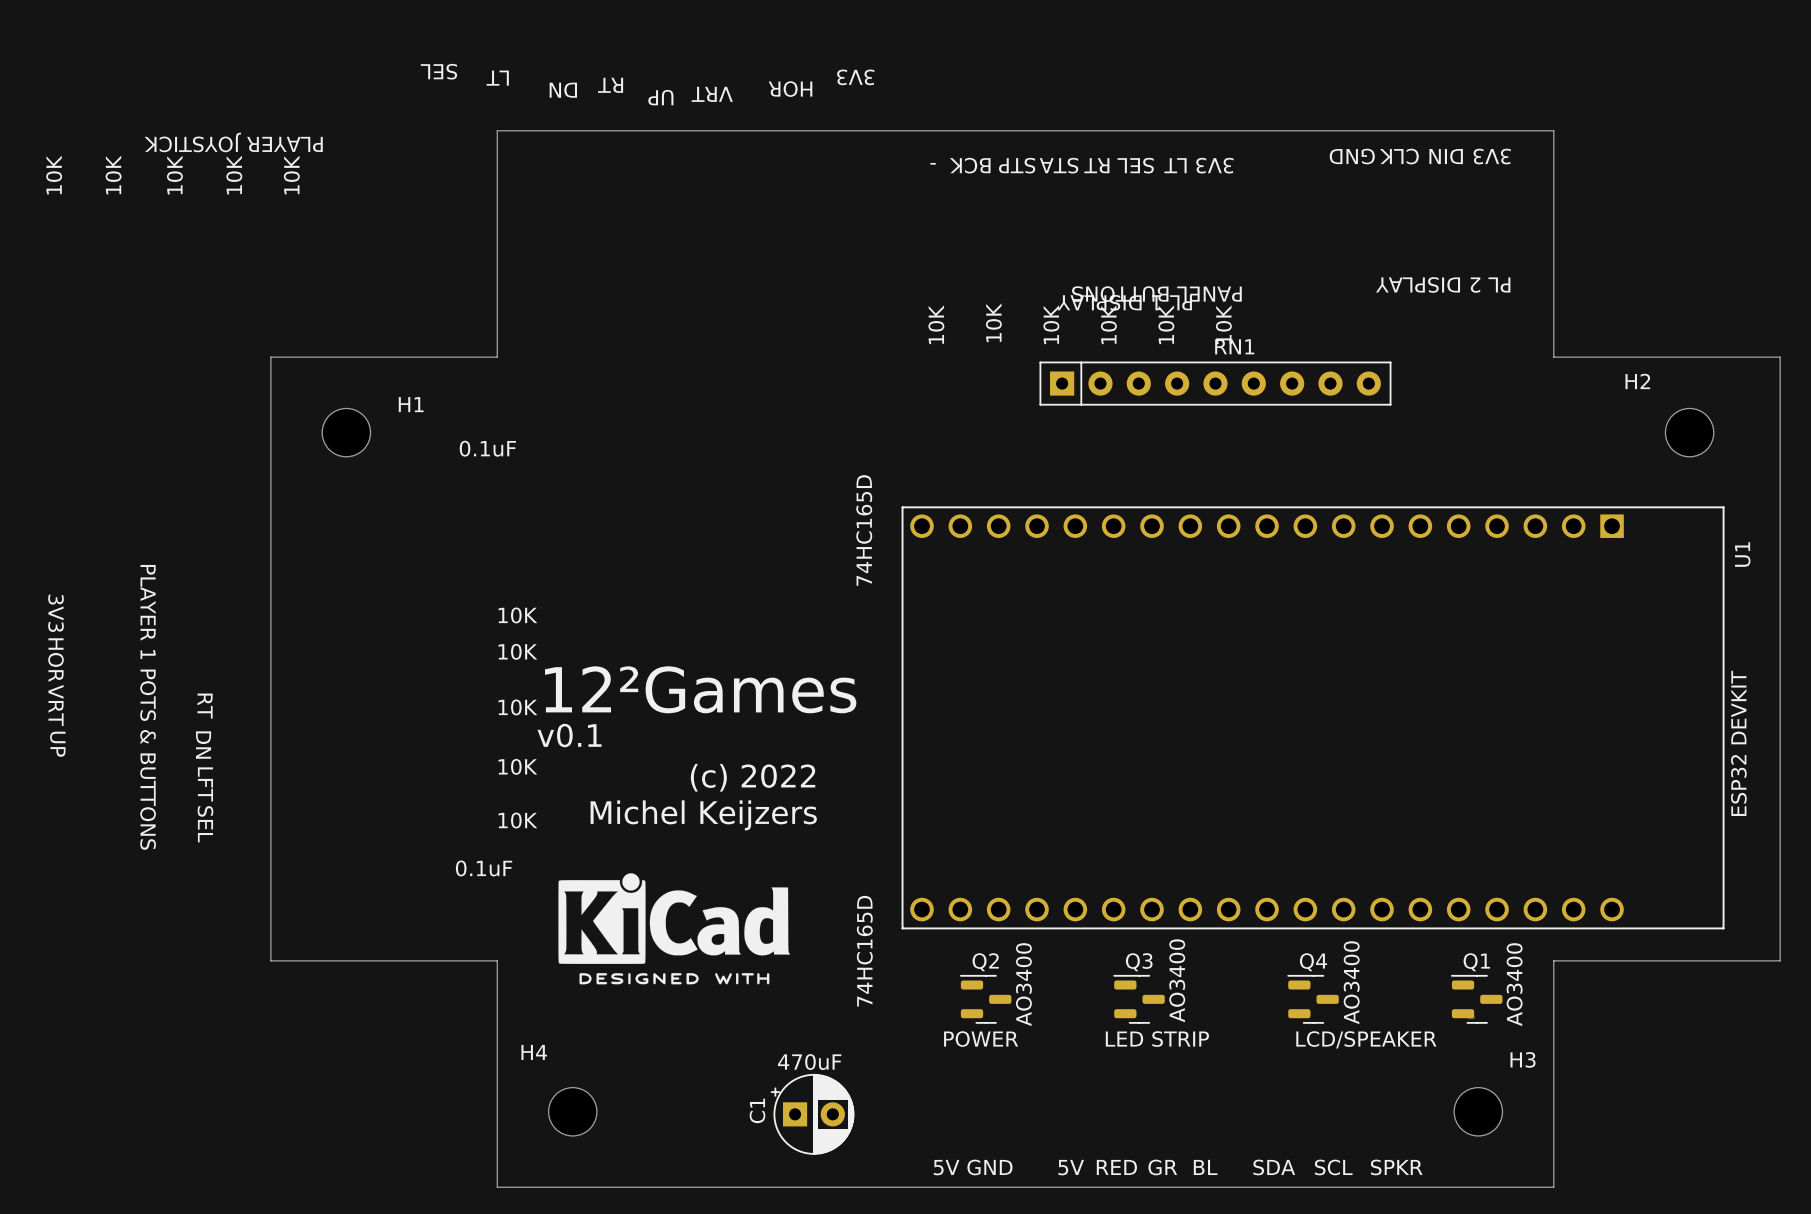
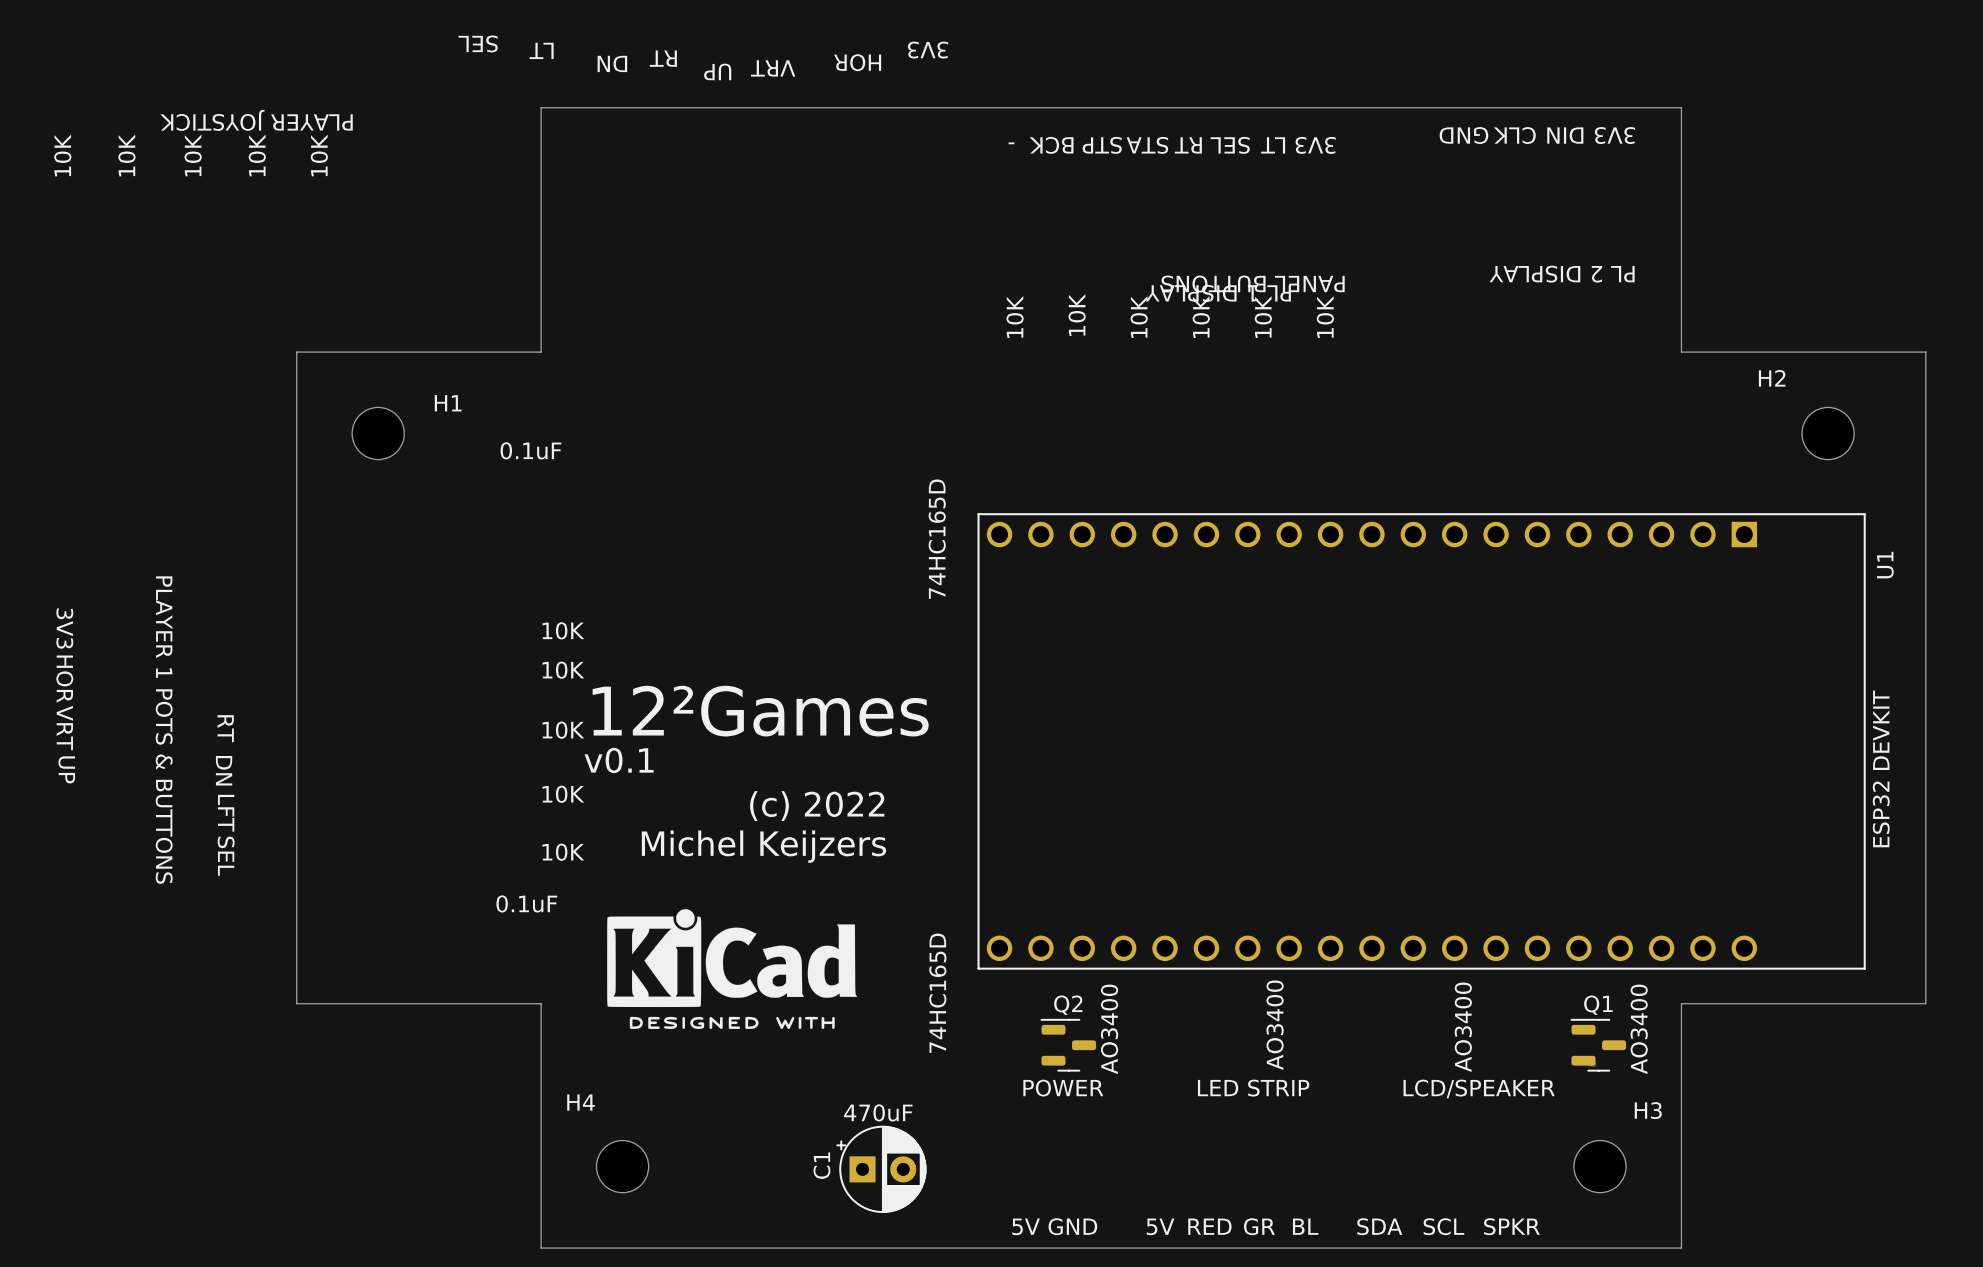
RN1: (1215, 383) -> none
Q3: (1139, 999) -> none
Q4: (1313, 999) -> none

